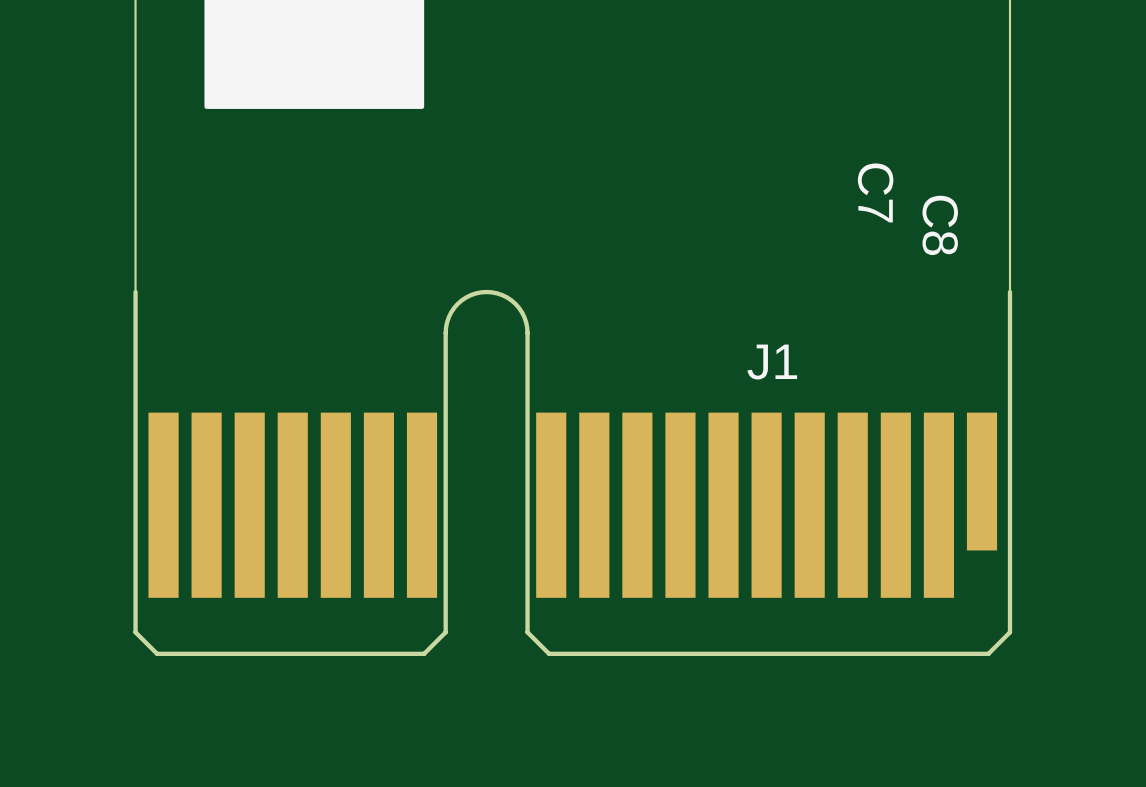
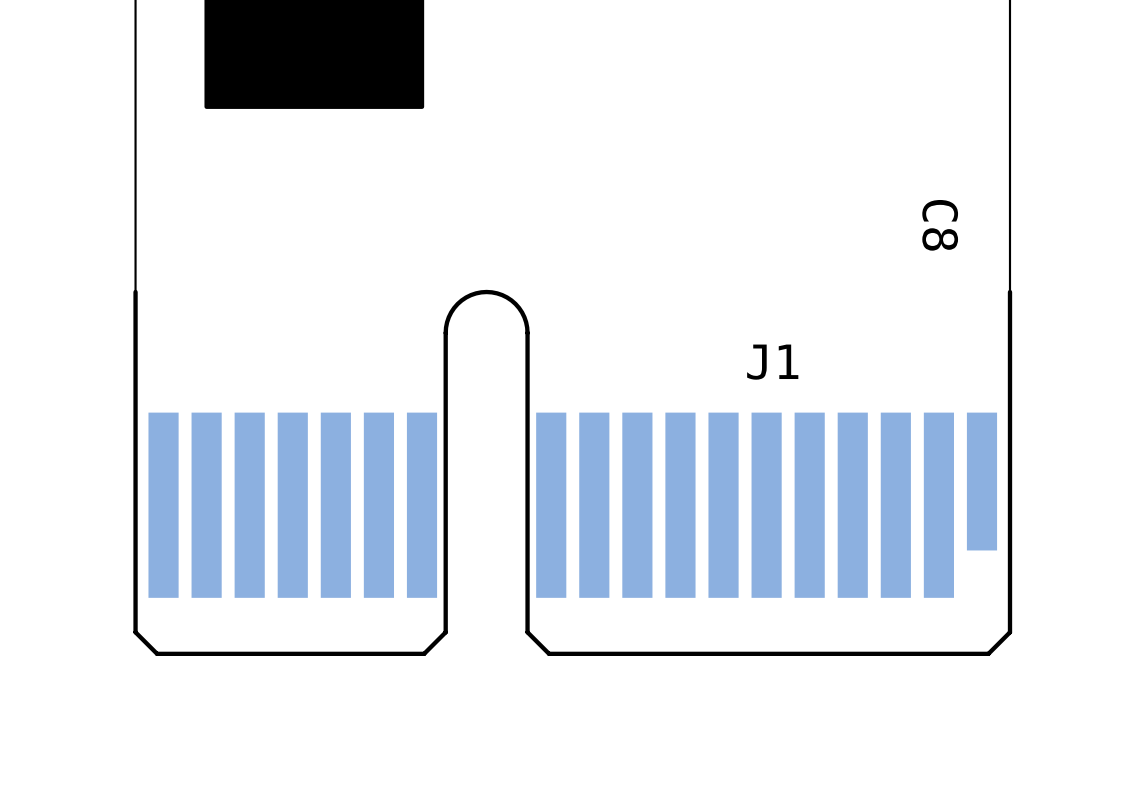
C7: (875, 192) -> none

